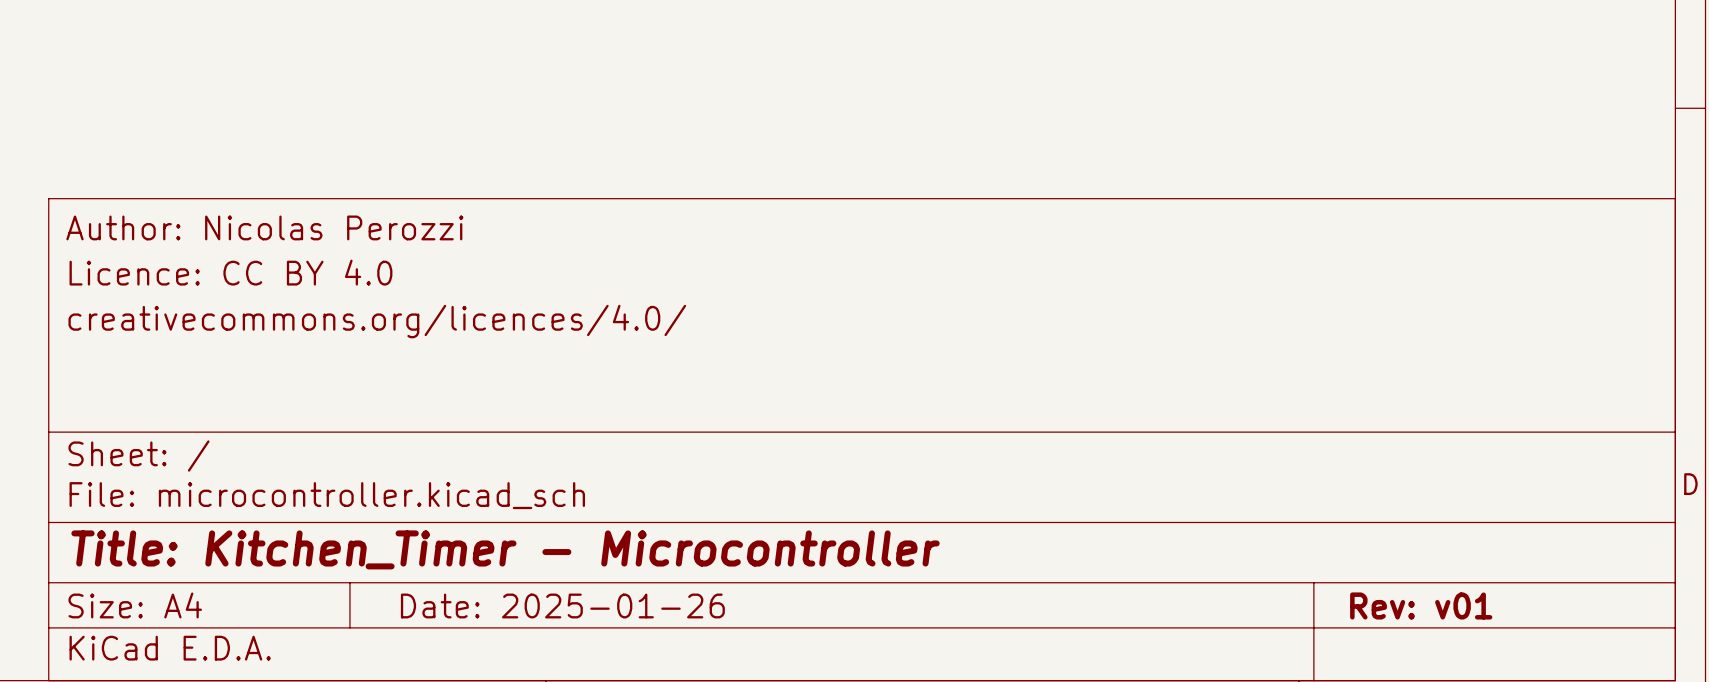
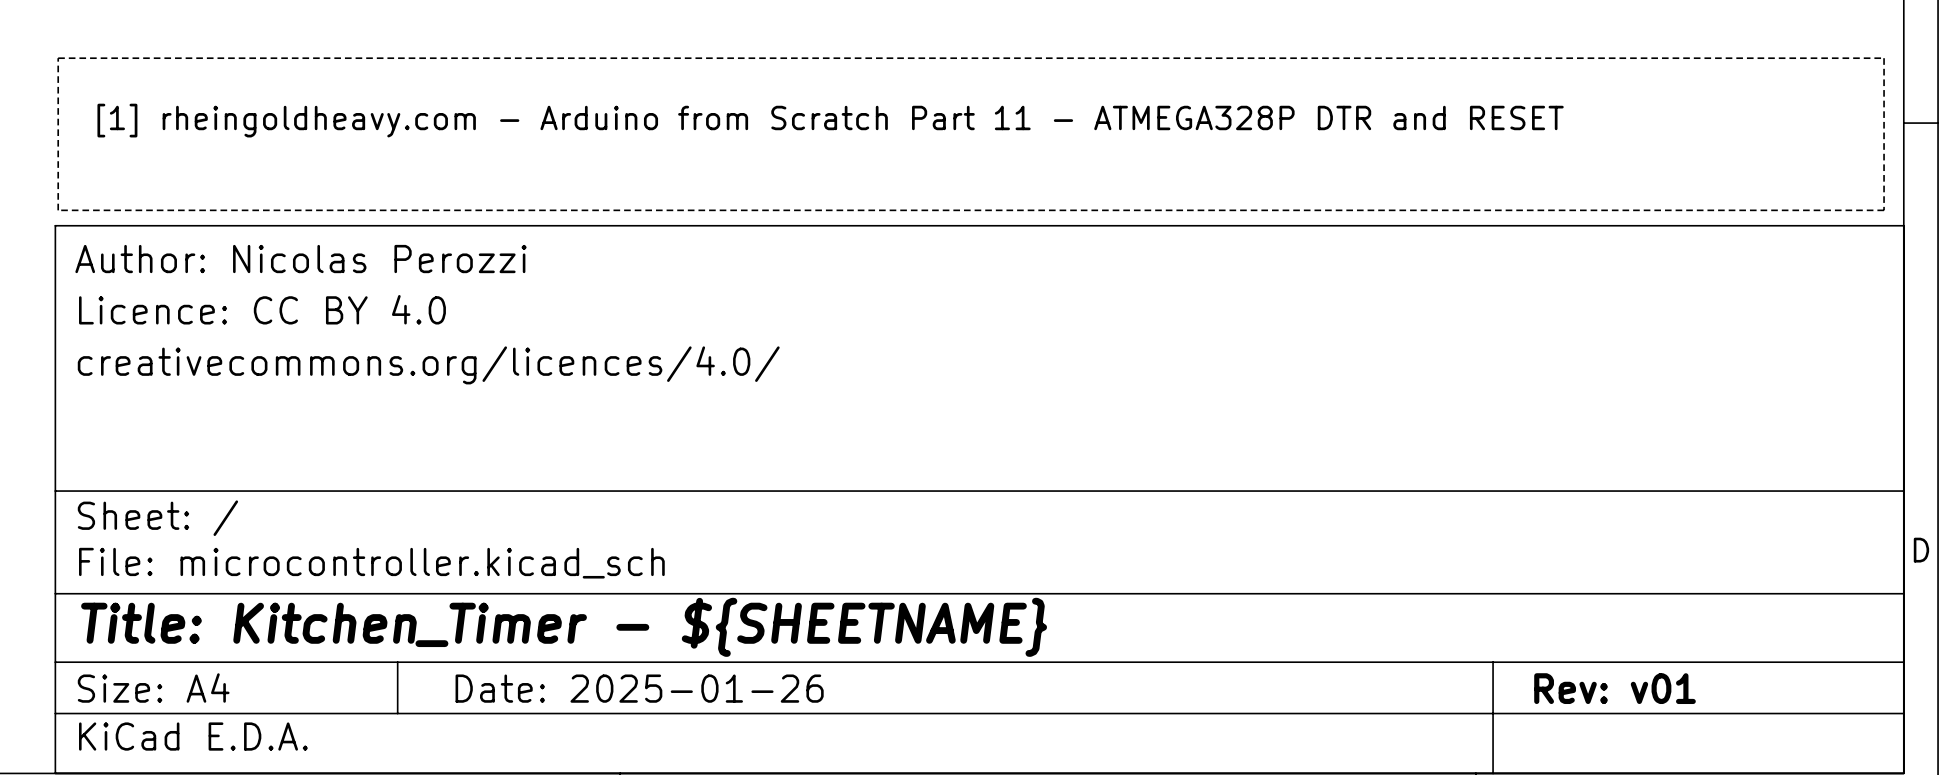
line: none -> (58, 58) (1884, 58) (1884, 210) (58, 210) (58, 58)
text: none -> [1] rheingoldheavy.com - Arduino from Scratch Part 11 - ATMEGA328P DTR and RESET (830, 120)
title block: Title: Kitchen_Timer - Microcontroller (505, 549) -> Title: Kitchen_Timer - ${SHEETNAME} (564, 627)

